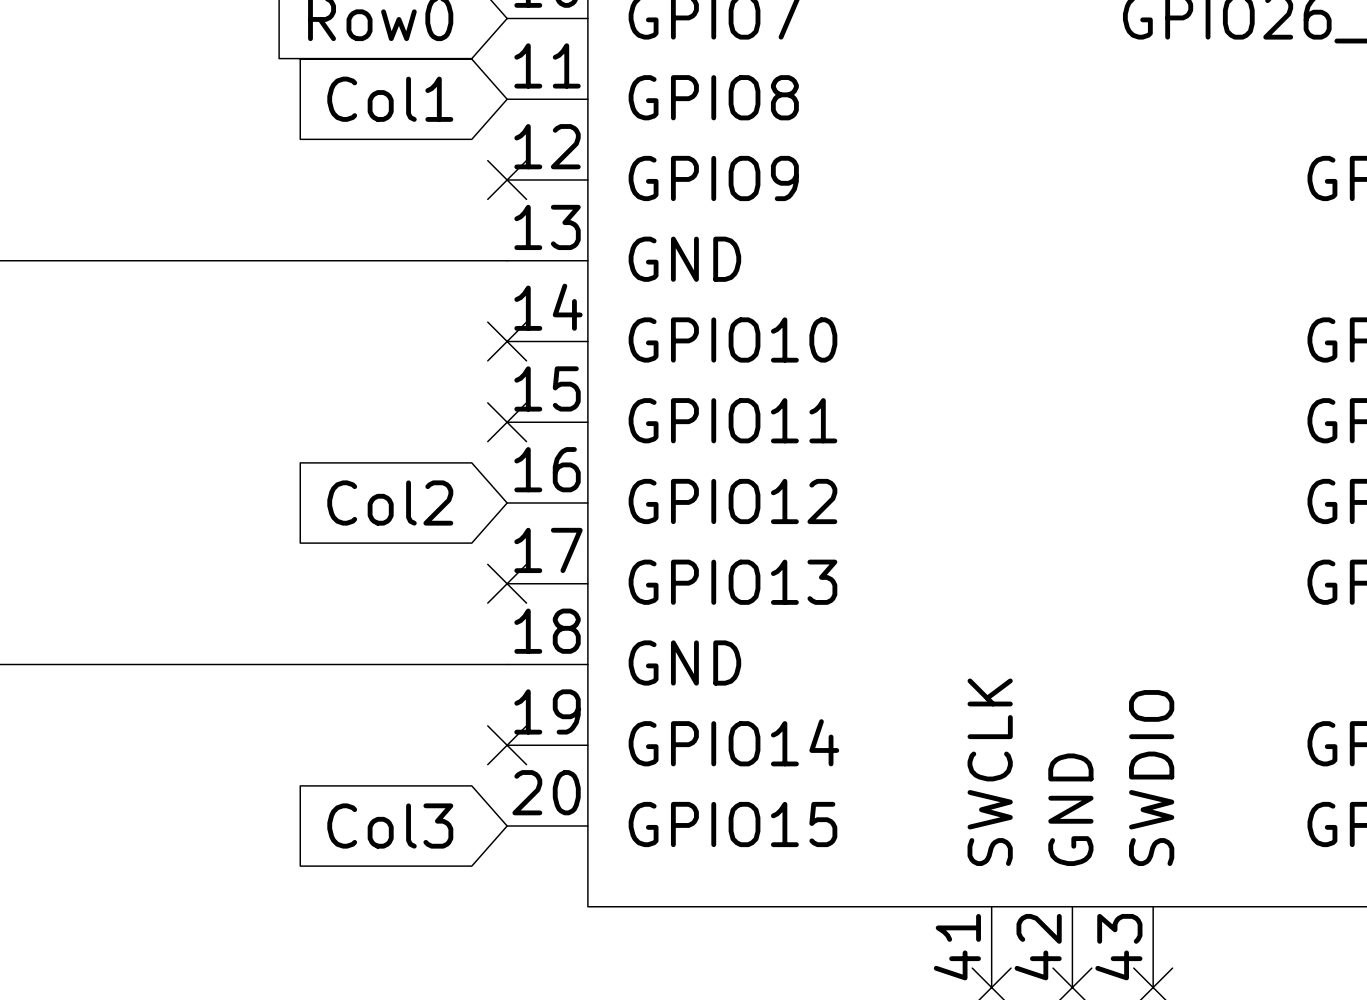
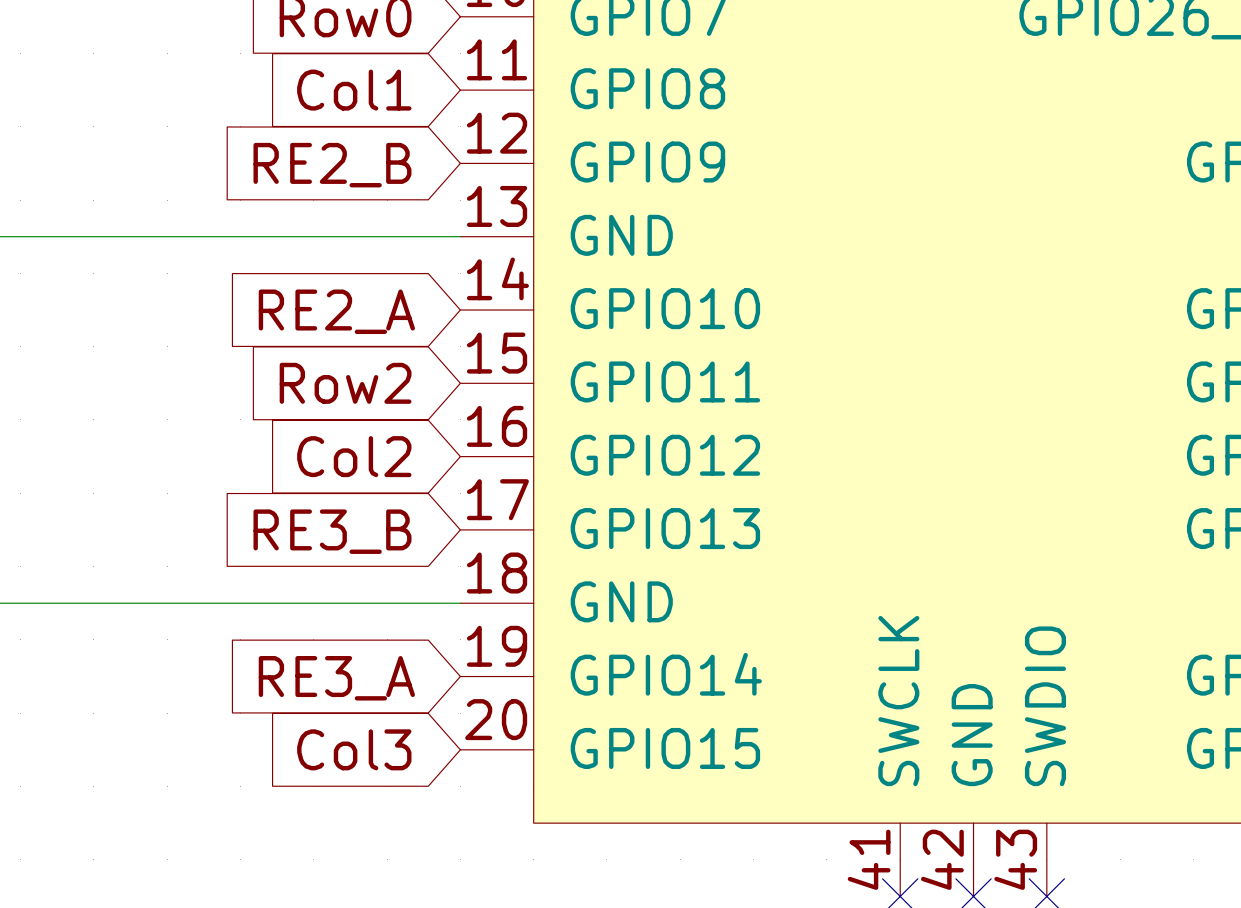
no-connect mark: (507, 180) -> none
global label: none -> RE2_B (332, 165)
no-connect mark: (507, 341) -> none
global label: none -> RE2_A (336, 311)
global label: none -> Row2 (345, 383)
no-connect mark: (507, 422) -> none
no-connect mark: (507, 583) -> none
global label: none -> RE3_B (332, 531)
no-connect mark: (507, 745) -> none
global label: none -> RE3_A (336, 678)

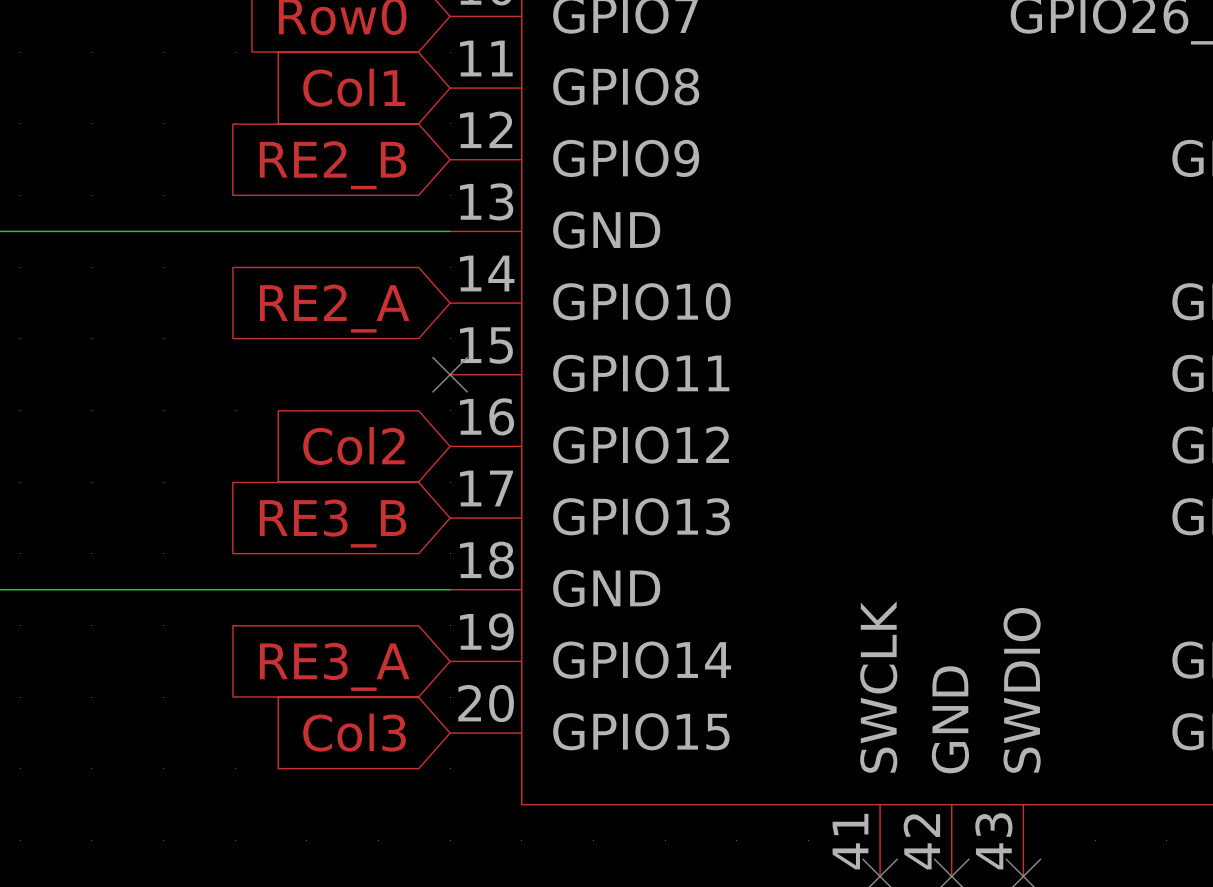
global label: Row2 (345, 383) -> none
no-connect mark: none -> (450, 374)

